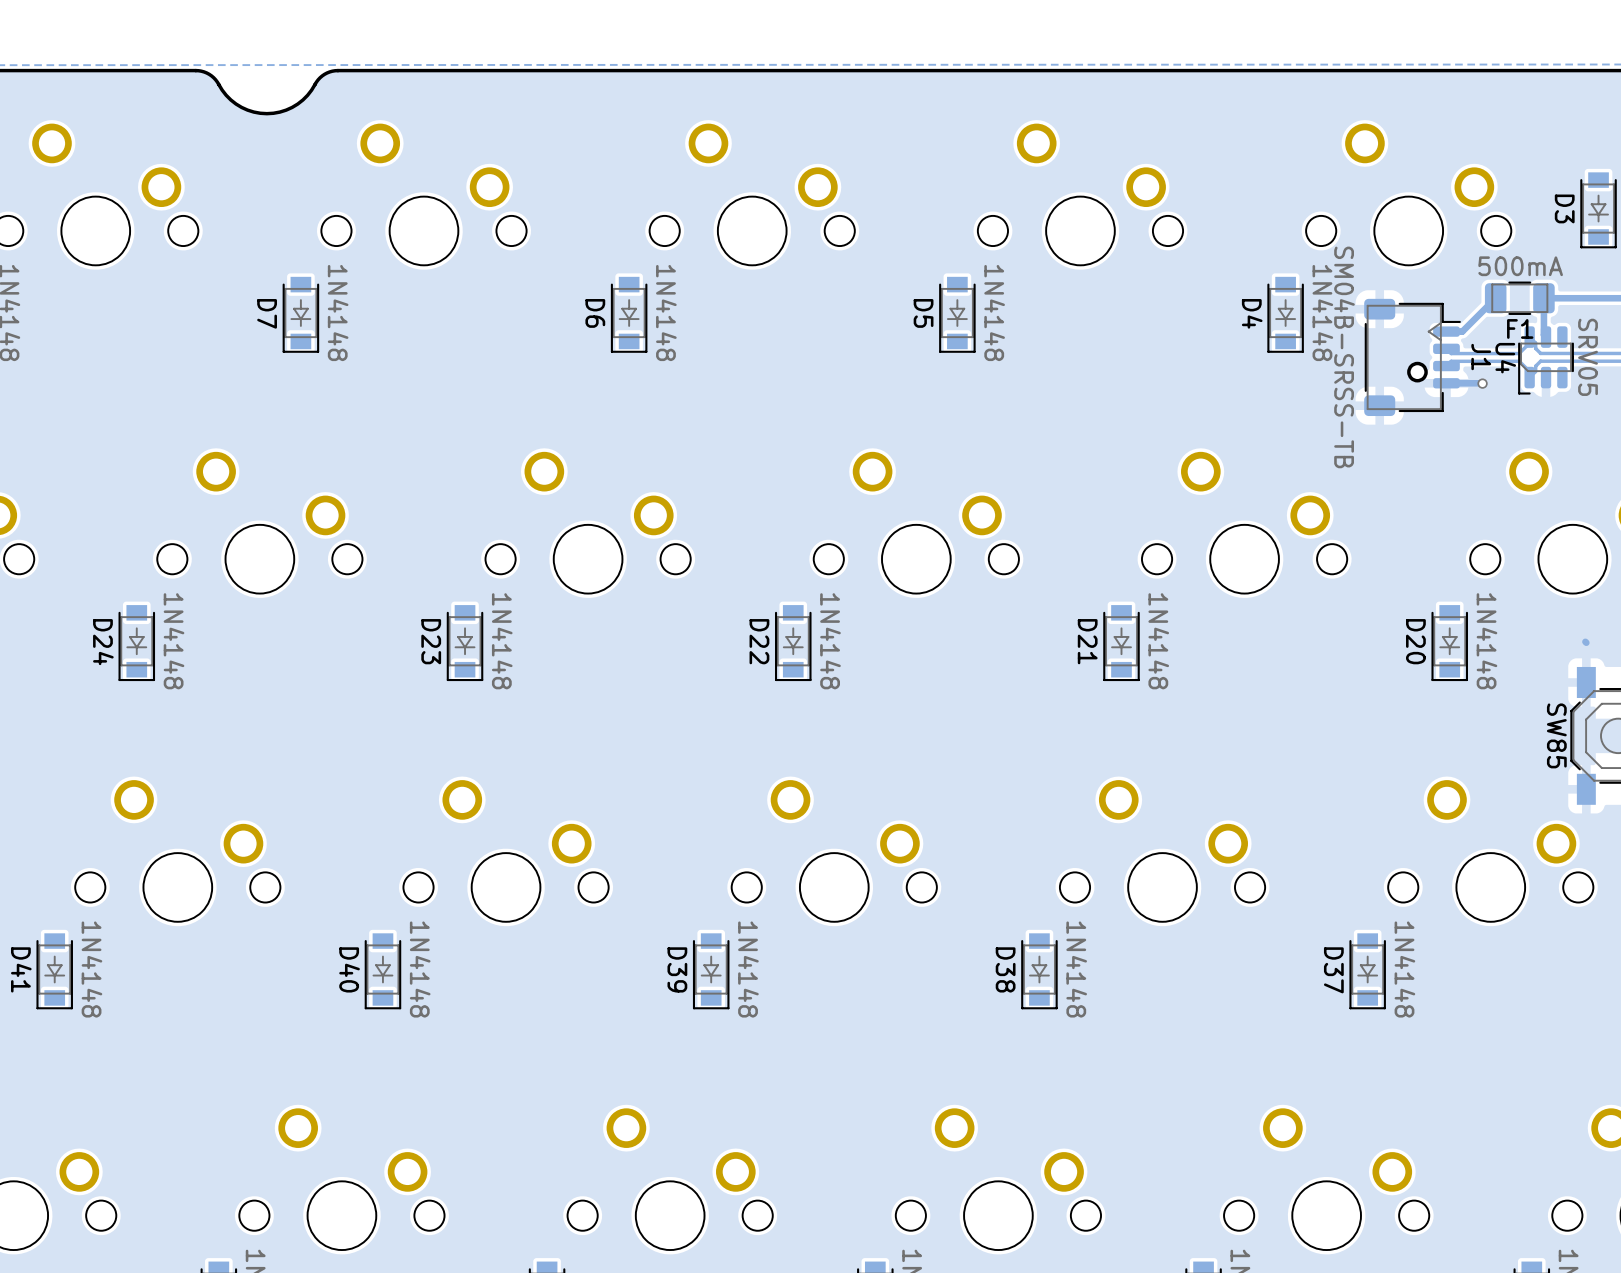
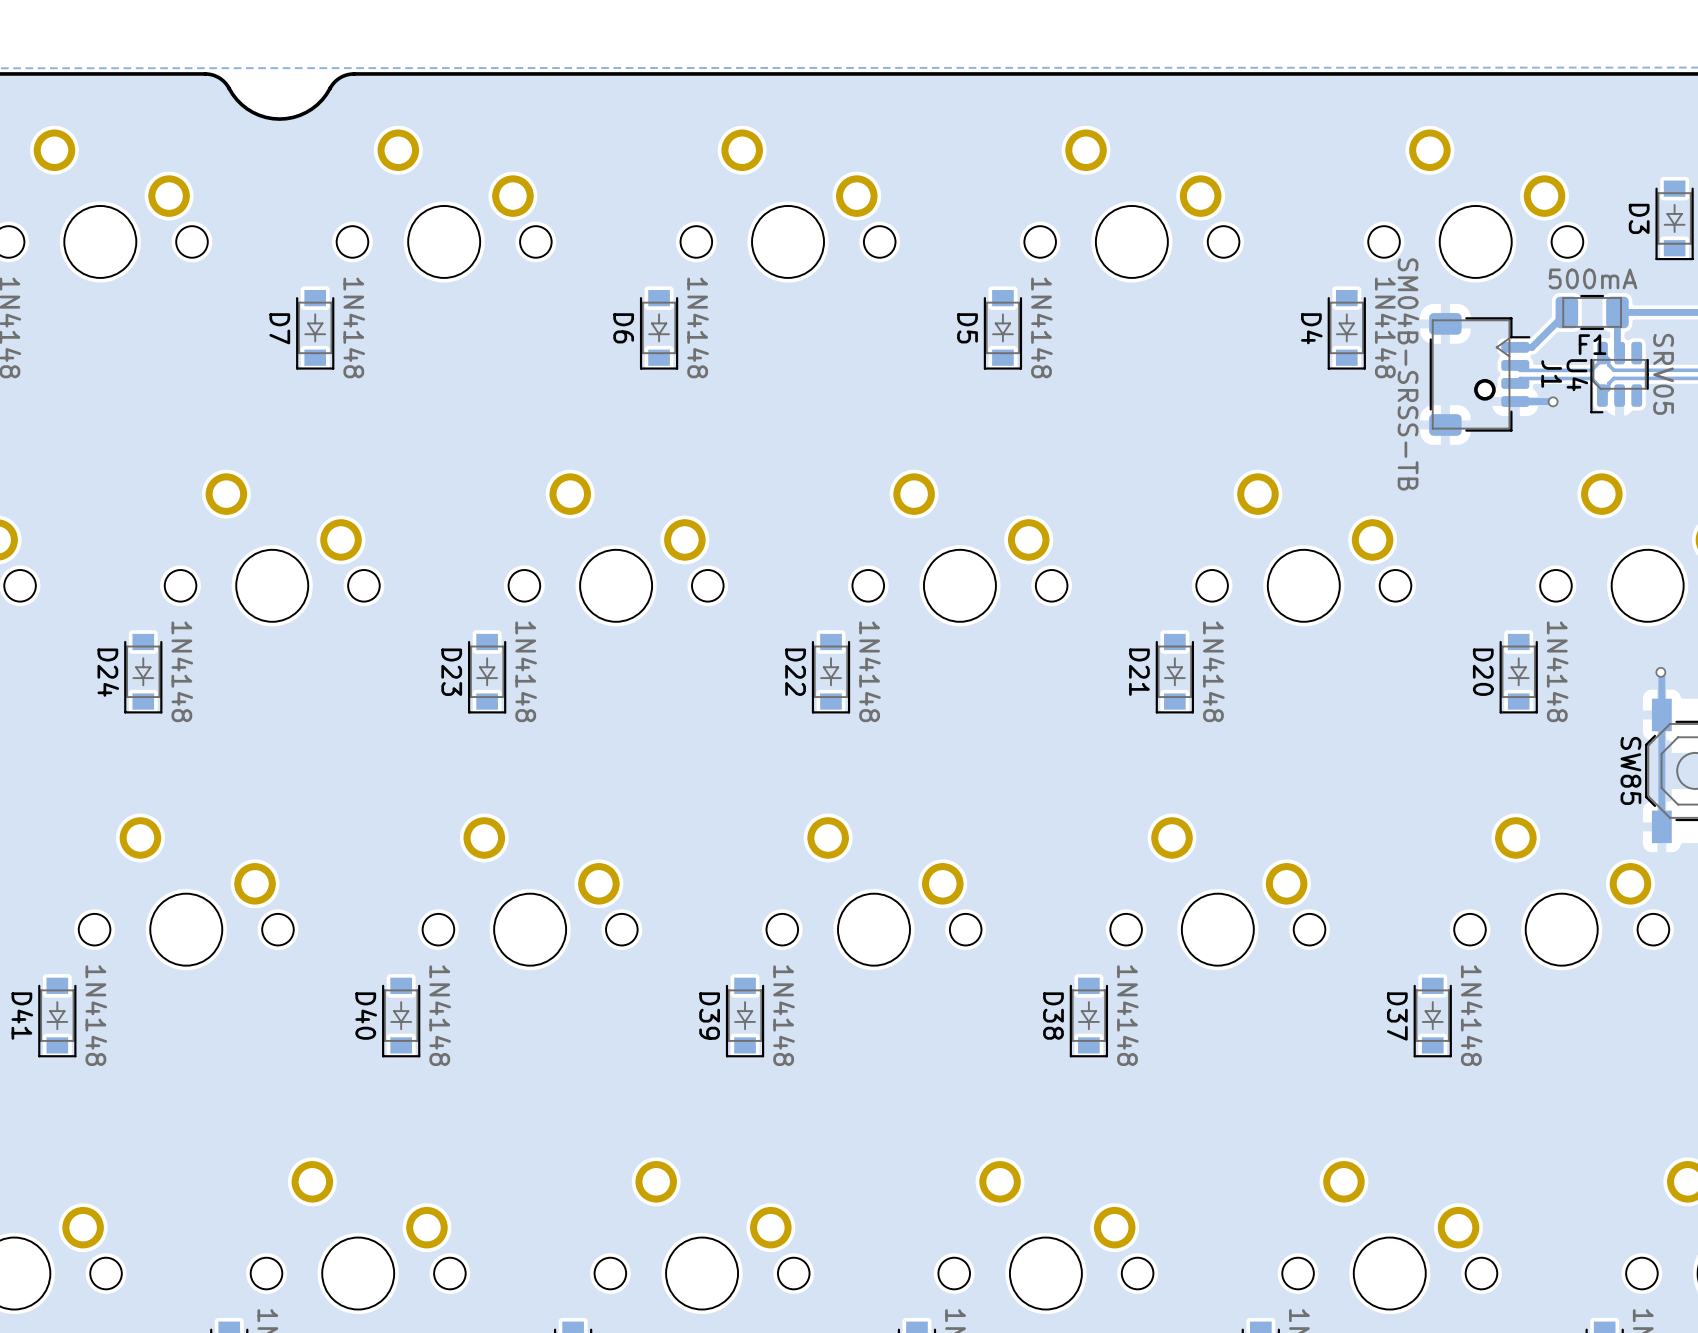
via: none -> (1660, 672)
track: none -> (1661, 673) (1661, 826)

